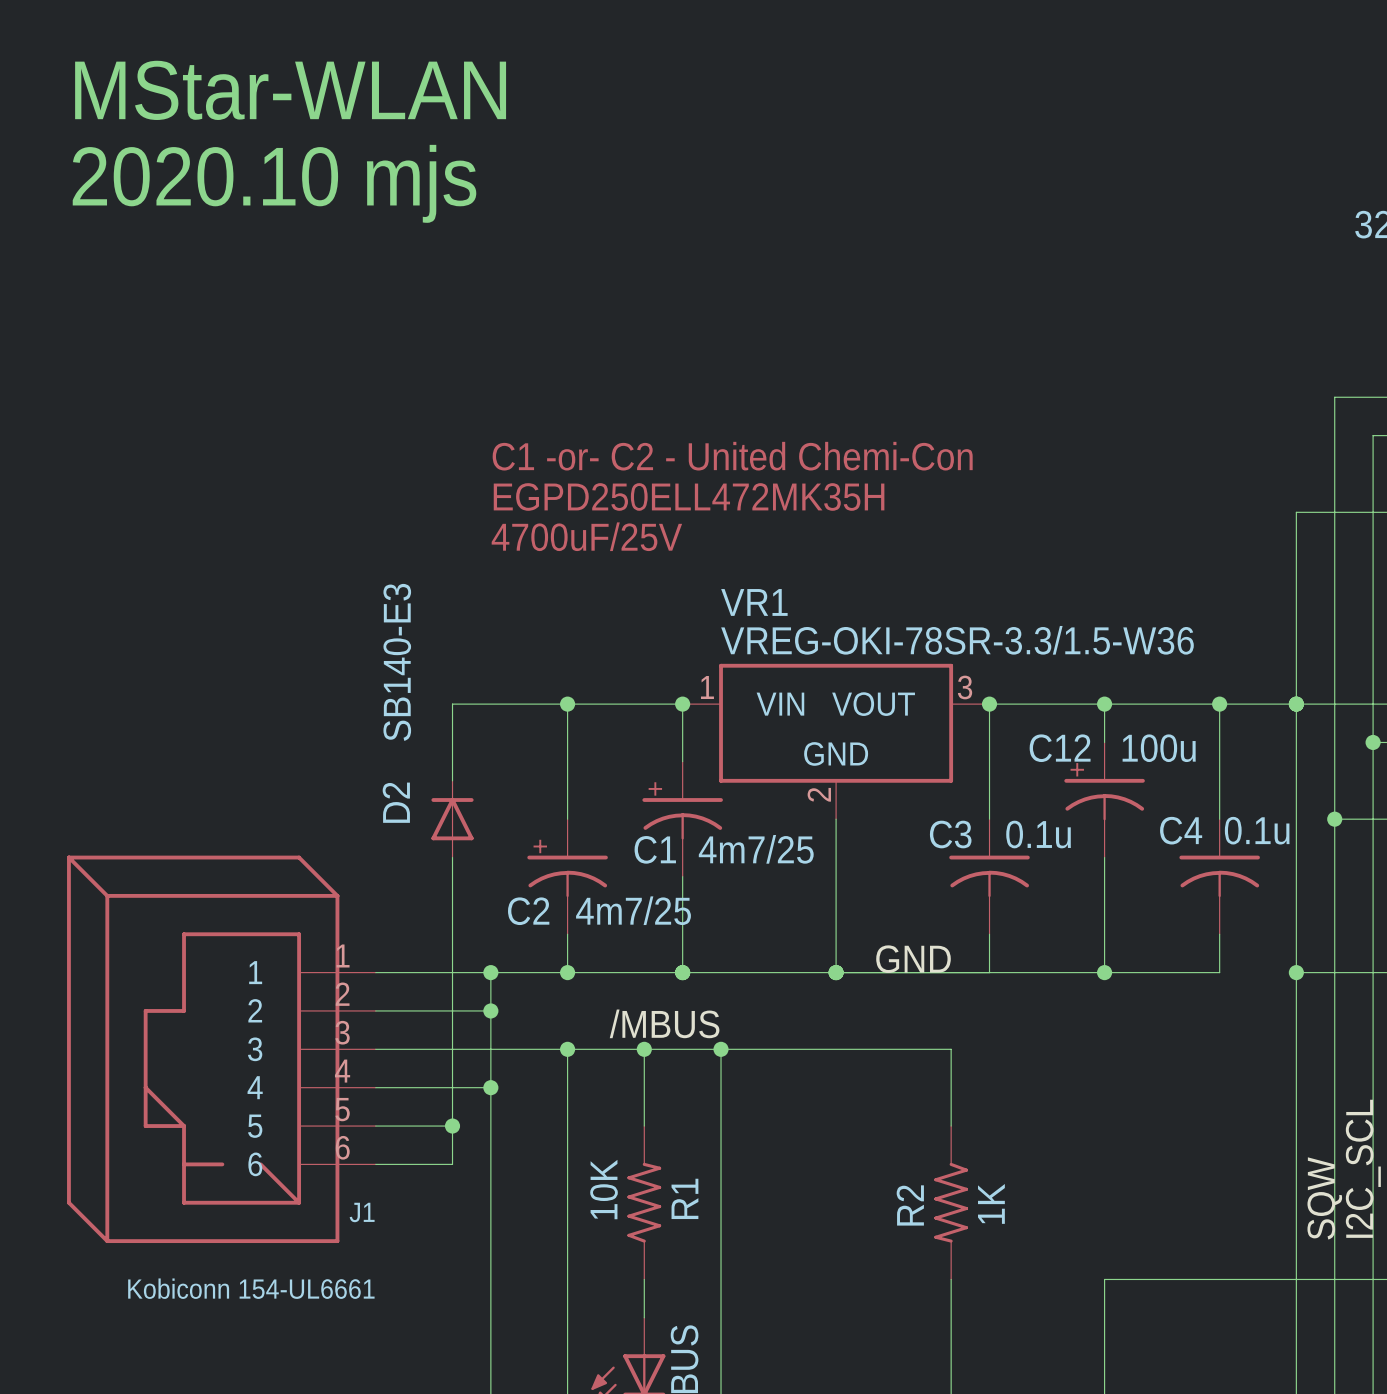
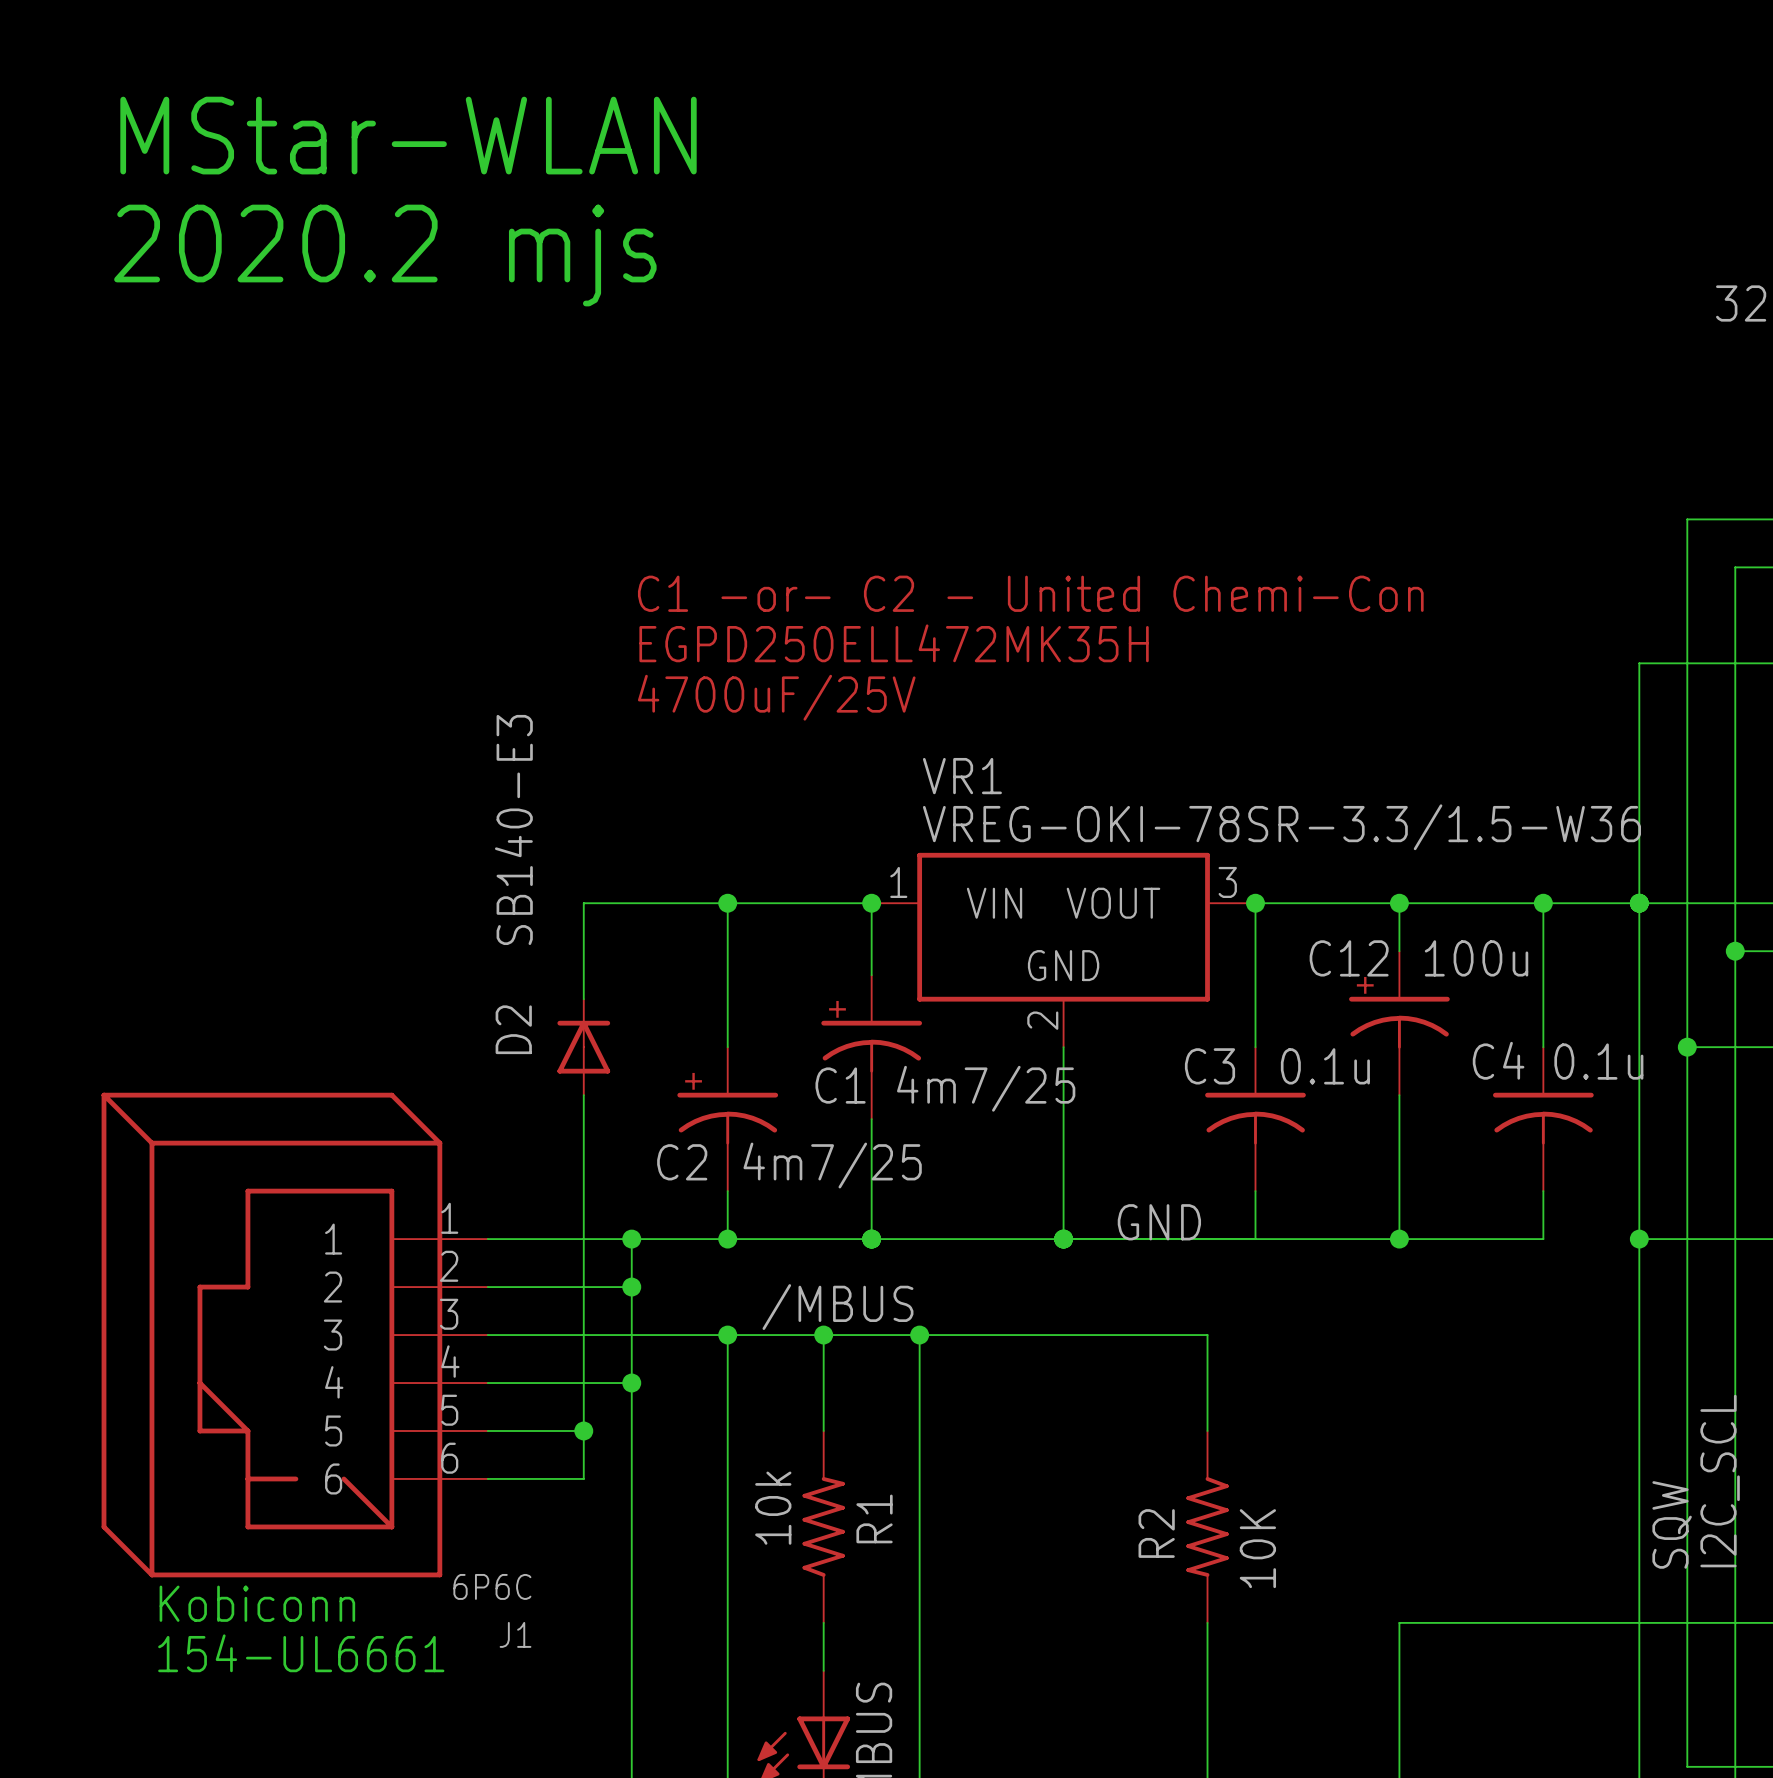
text: 2020.10 mjs (274, 183) -> 2020.2 mjs (385, 255)
R1 value: 10K (604, 1189) -> 10k (773, 1508)
R2 value: 1K (991, 1203) -> 10K (1257, 1548)
J1 name position: J1 (362, 1212) -> J1 (515, 1634)
text: none -> Kobiconn (257, 1603)
J1 value: Kobiconn 154-UL6661 (251, 1288) -> 6P6C (492, 1586)
text: none -> 154-UL6661 (301, 1653)

